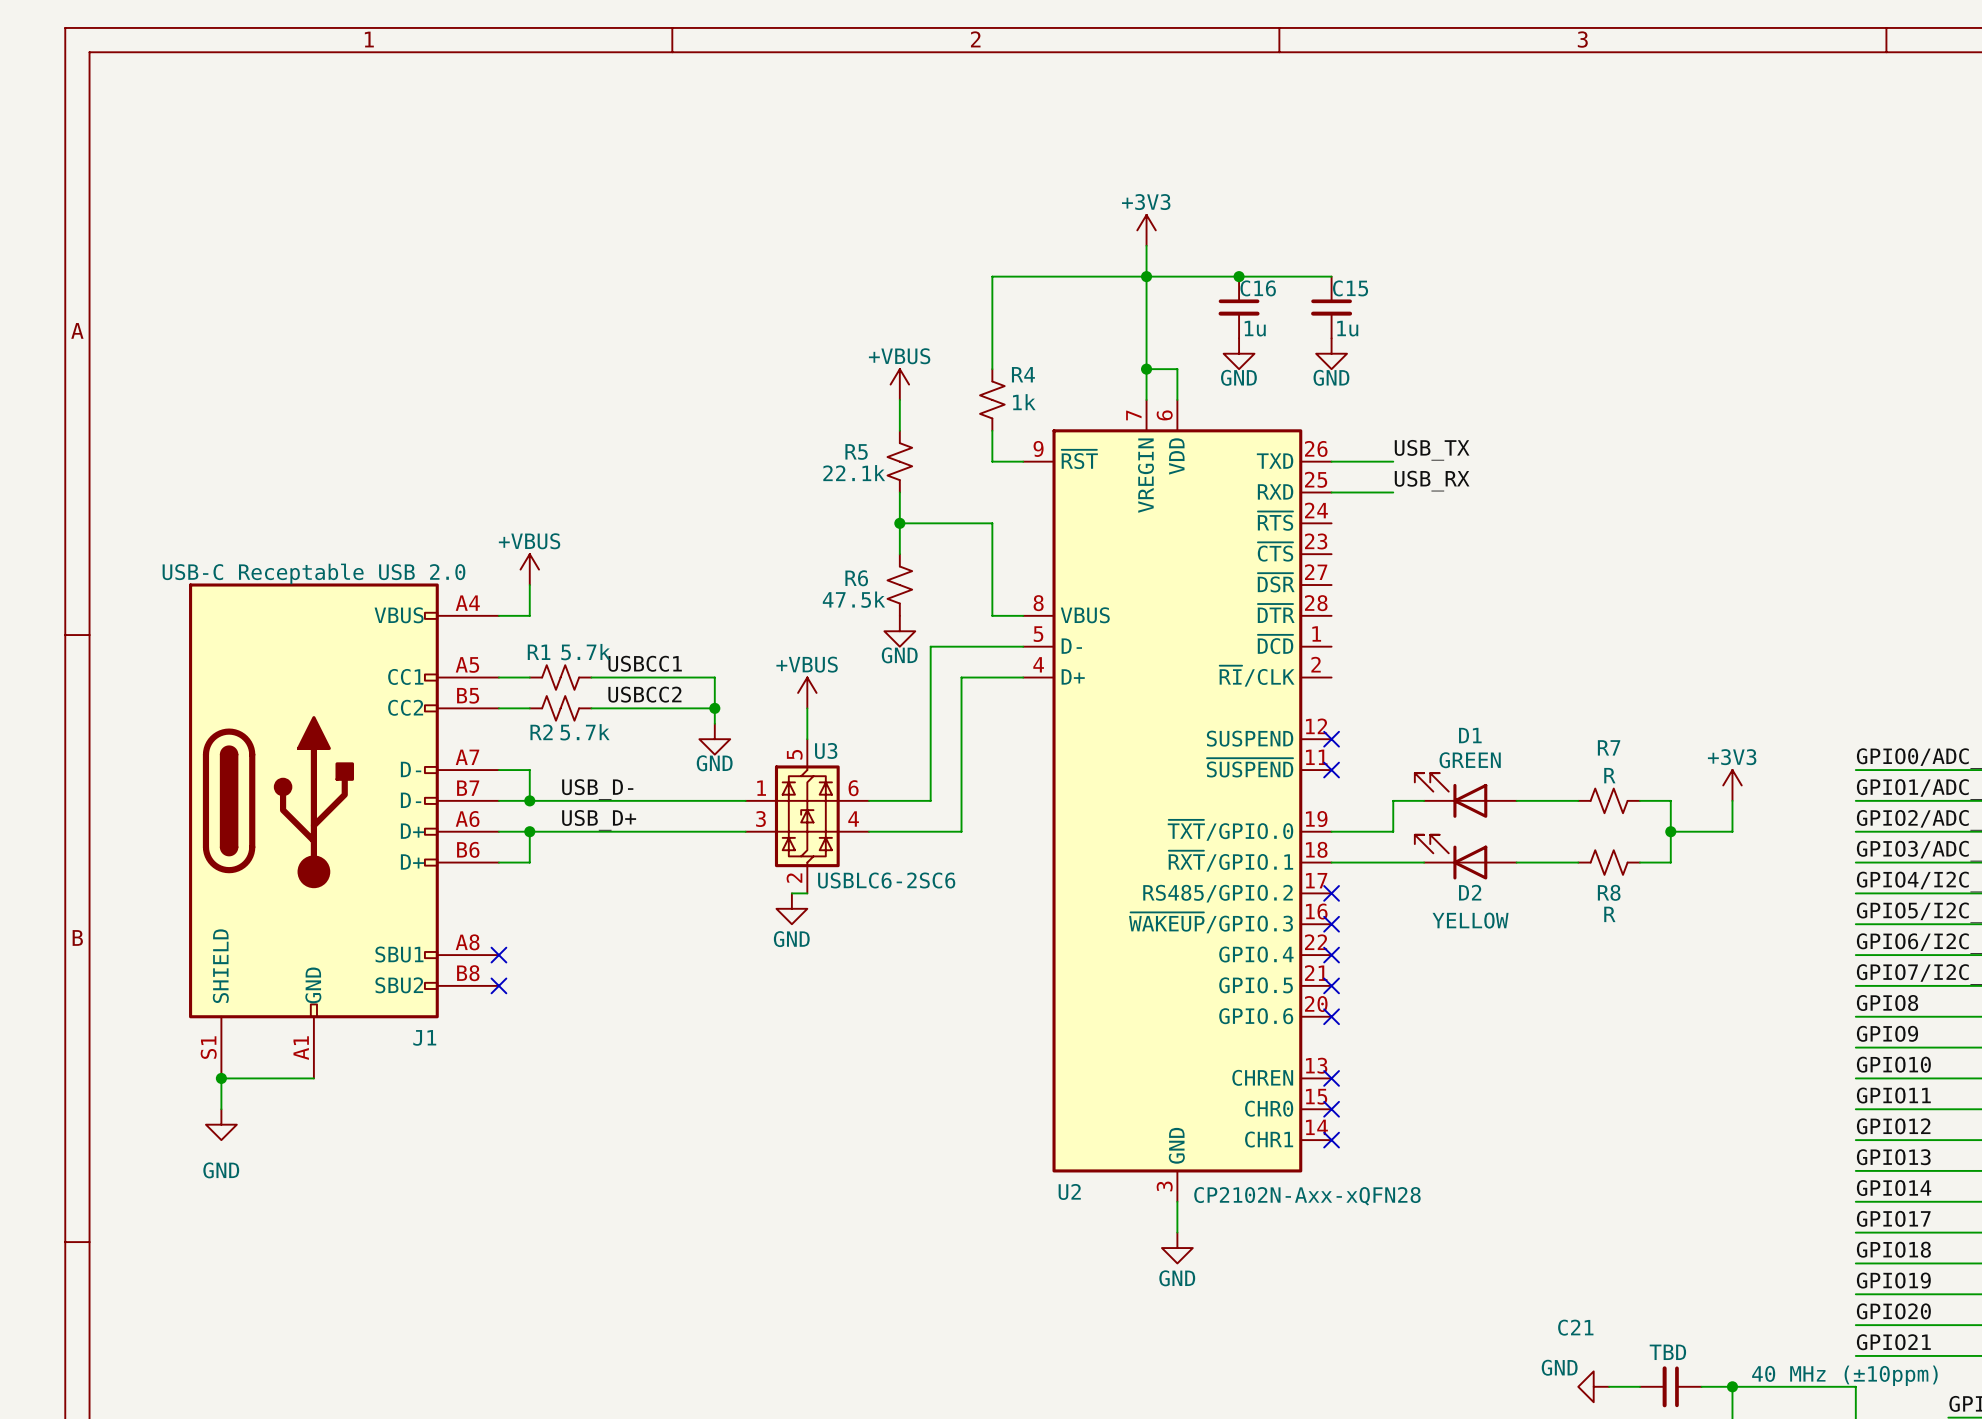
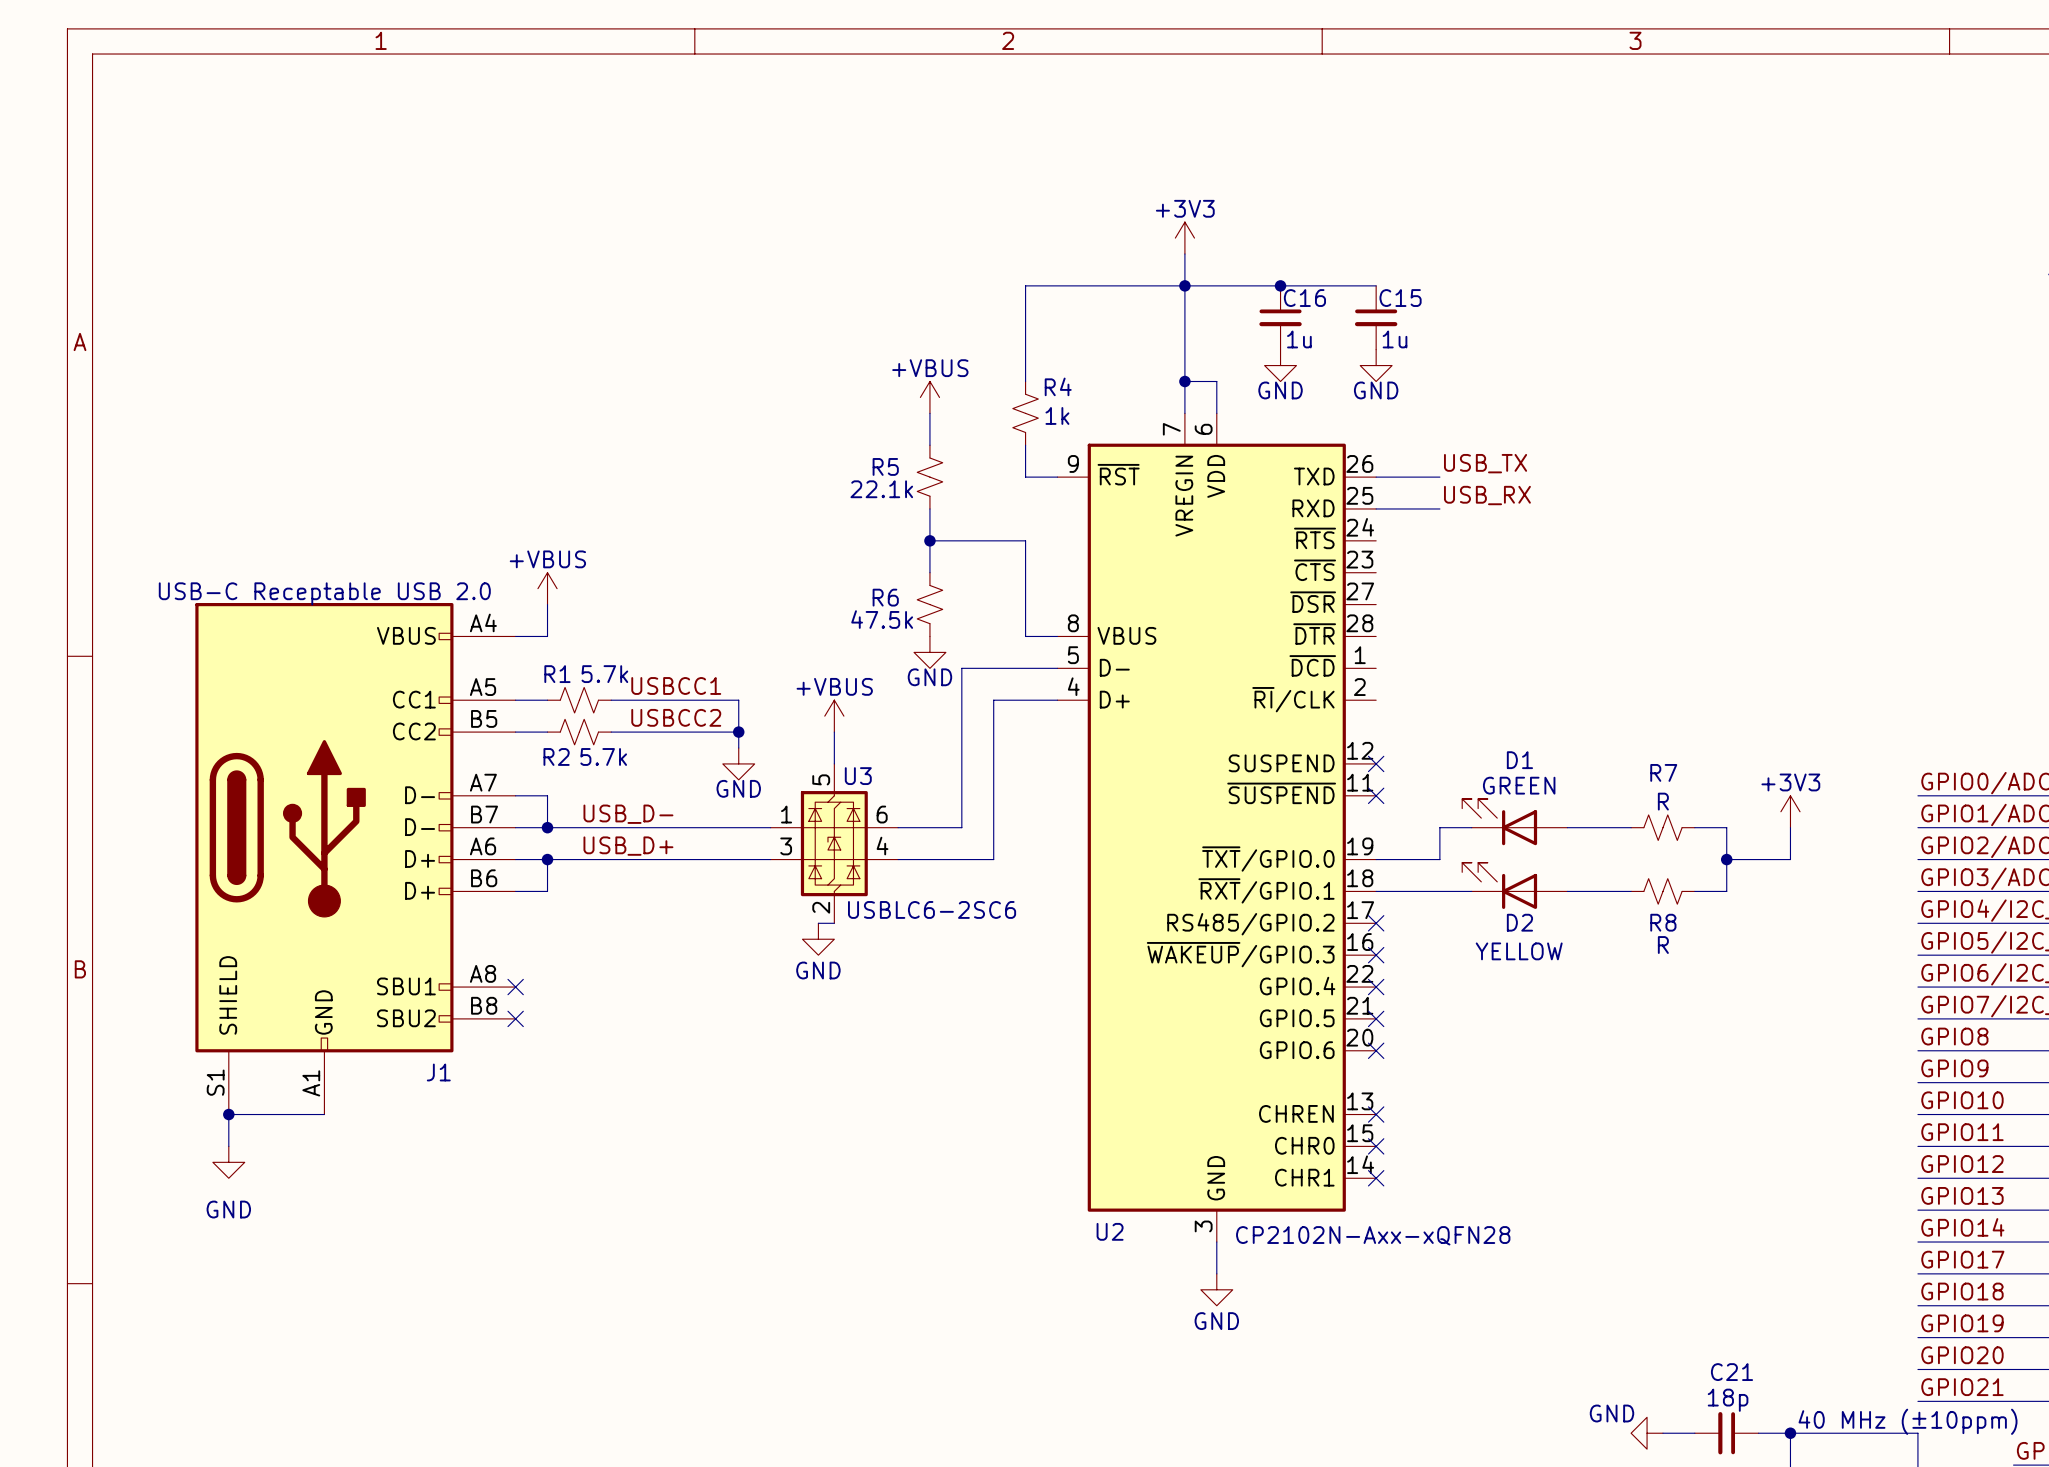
C21 name position: C21 (1575, 1327) -> C21 (1732, 1372)
C21 value: TBD (1667, 1352) -> 18p (1728, 1400)

